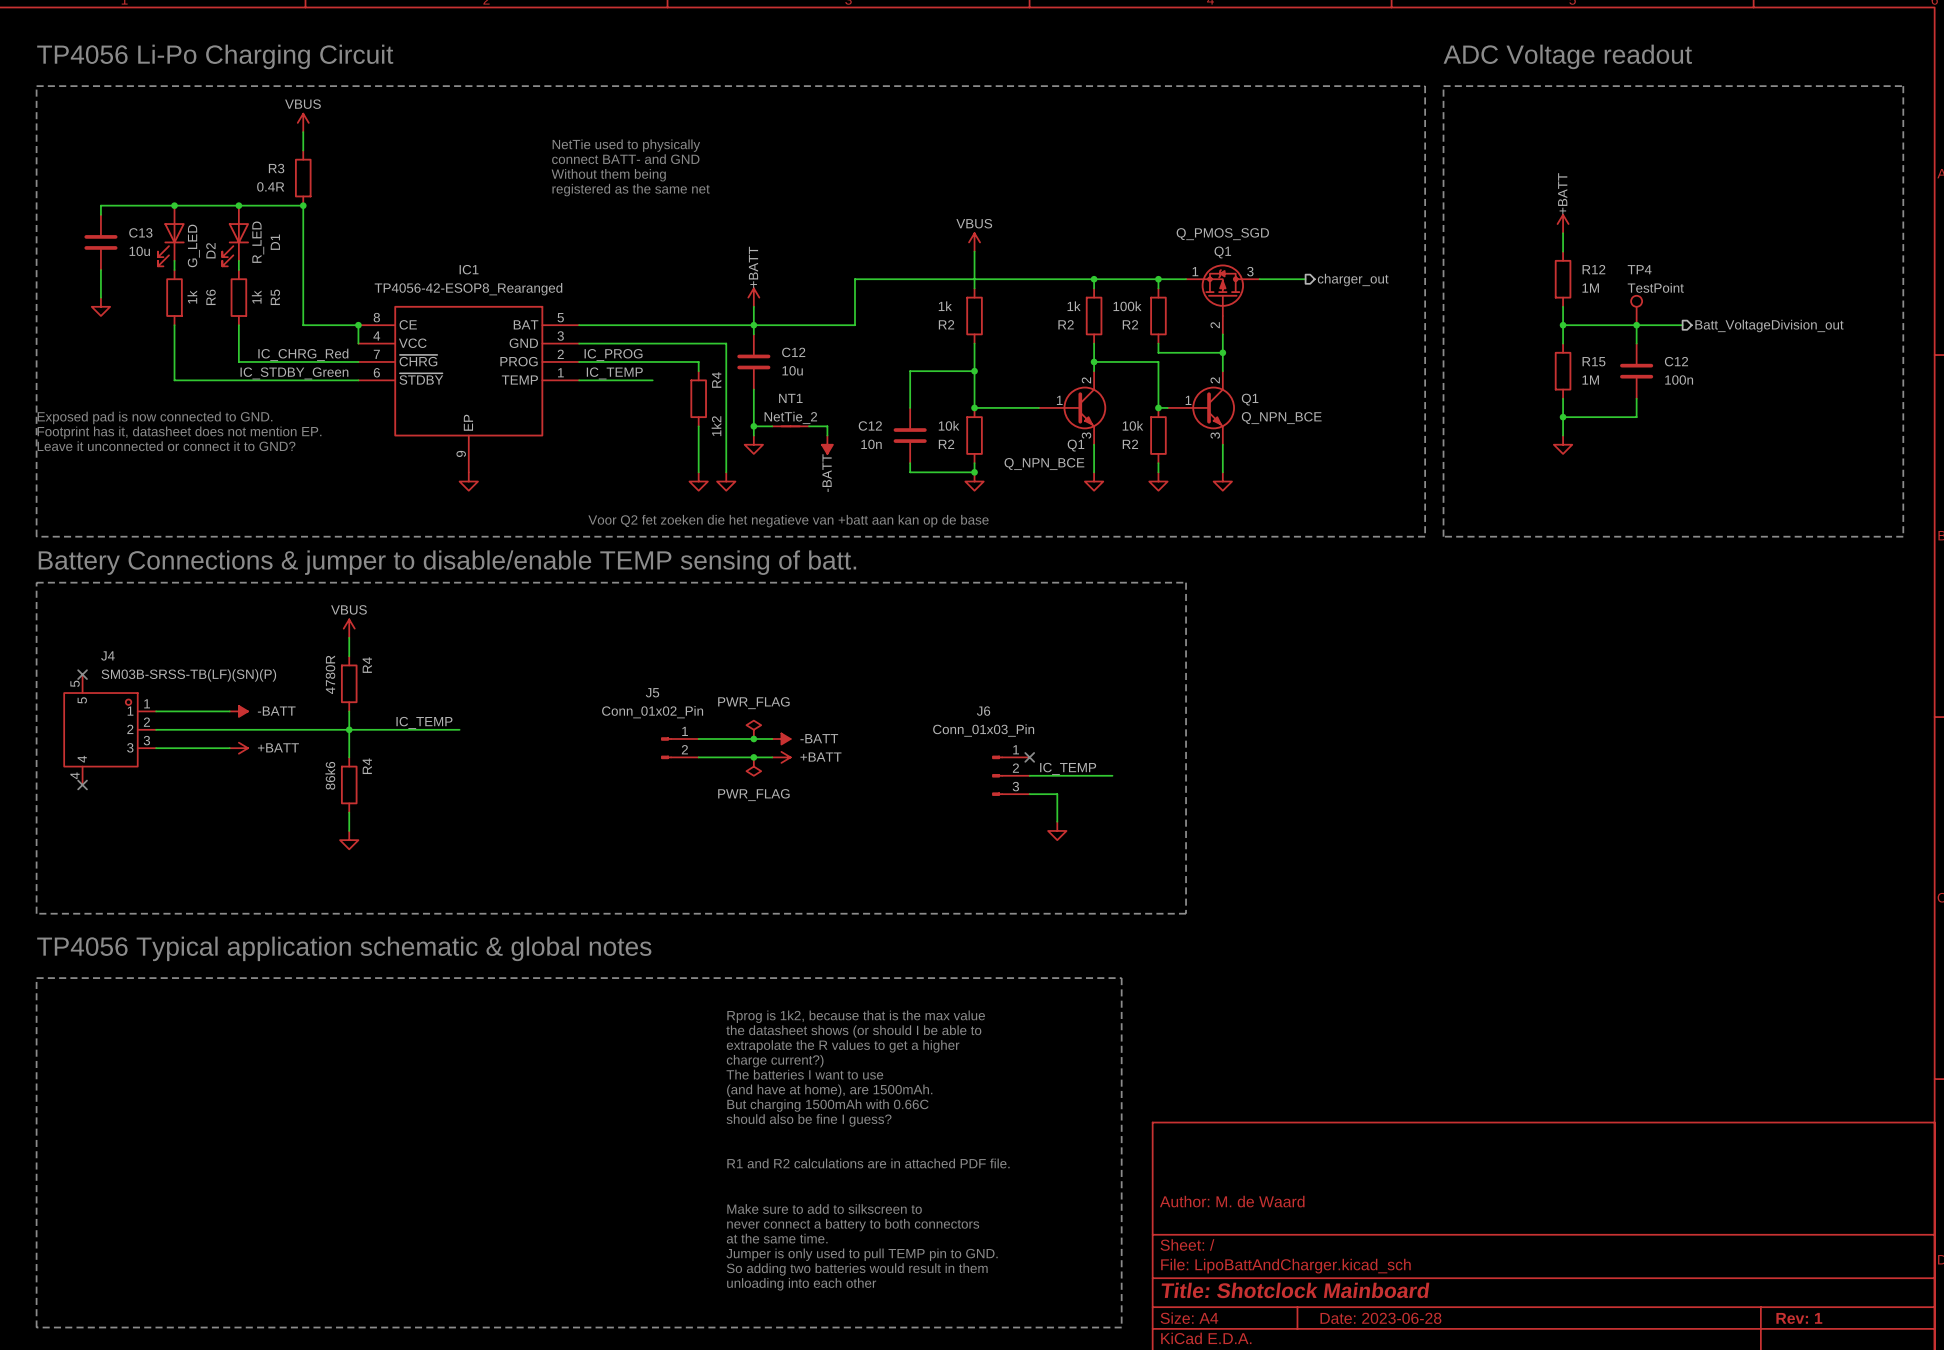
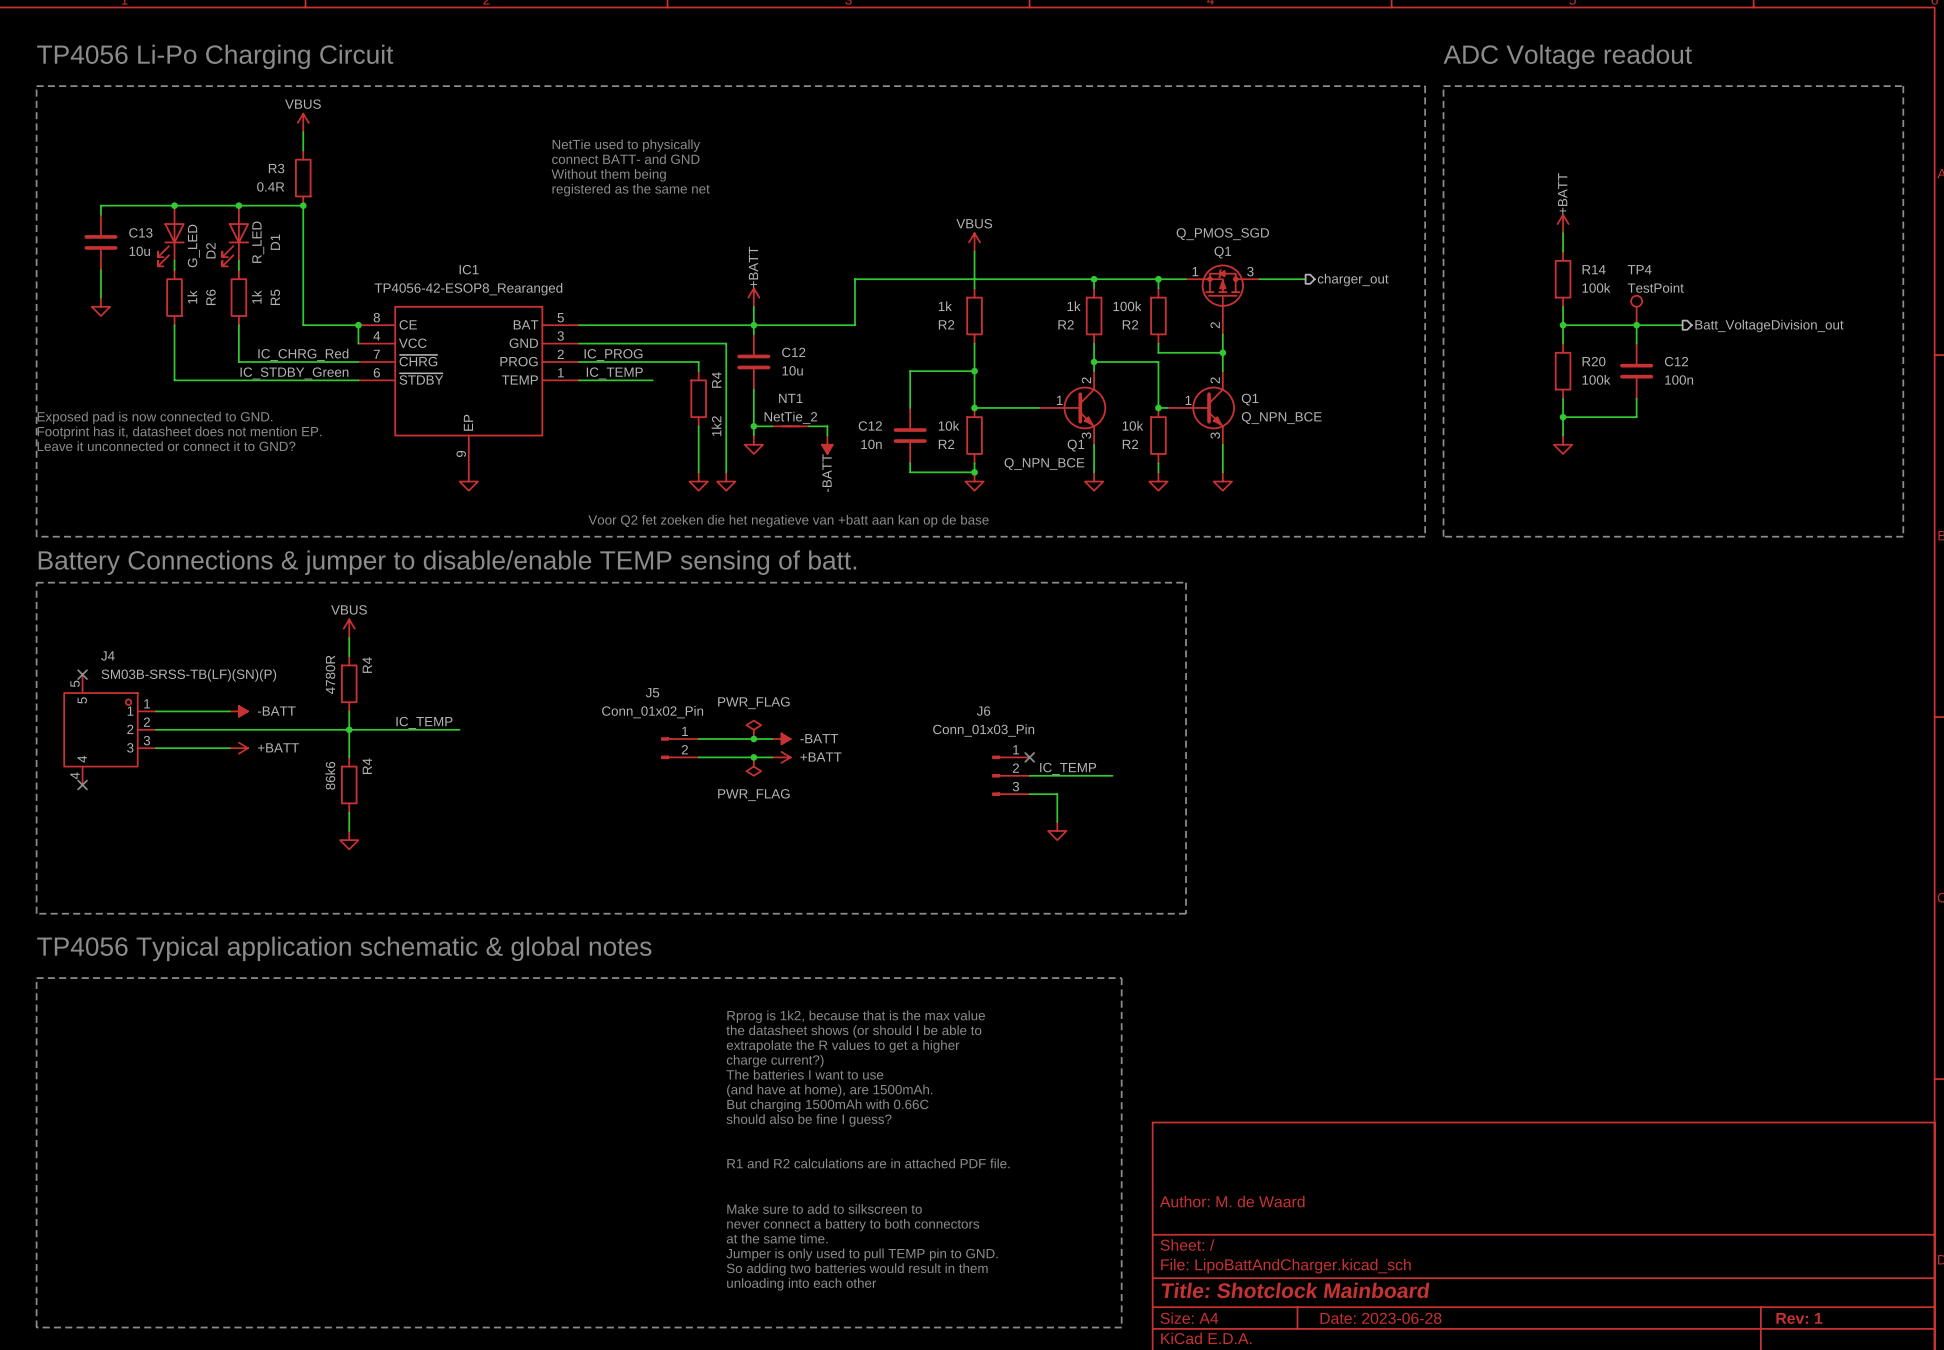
R12 name: R12 (1593, 269) -> R14 (1594, 269)
R12 value: 1M (1590, 288) -> 100k (1596, 287)
R15 name: R15 (1593, 361) -> R20 (1594, 361)
R15 value: 1M (1590, 380) -> 100k (1596, 379)

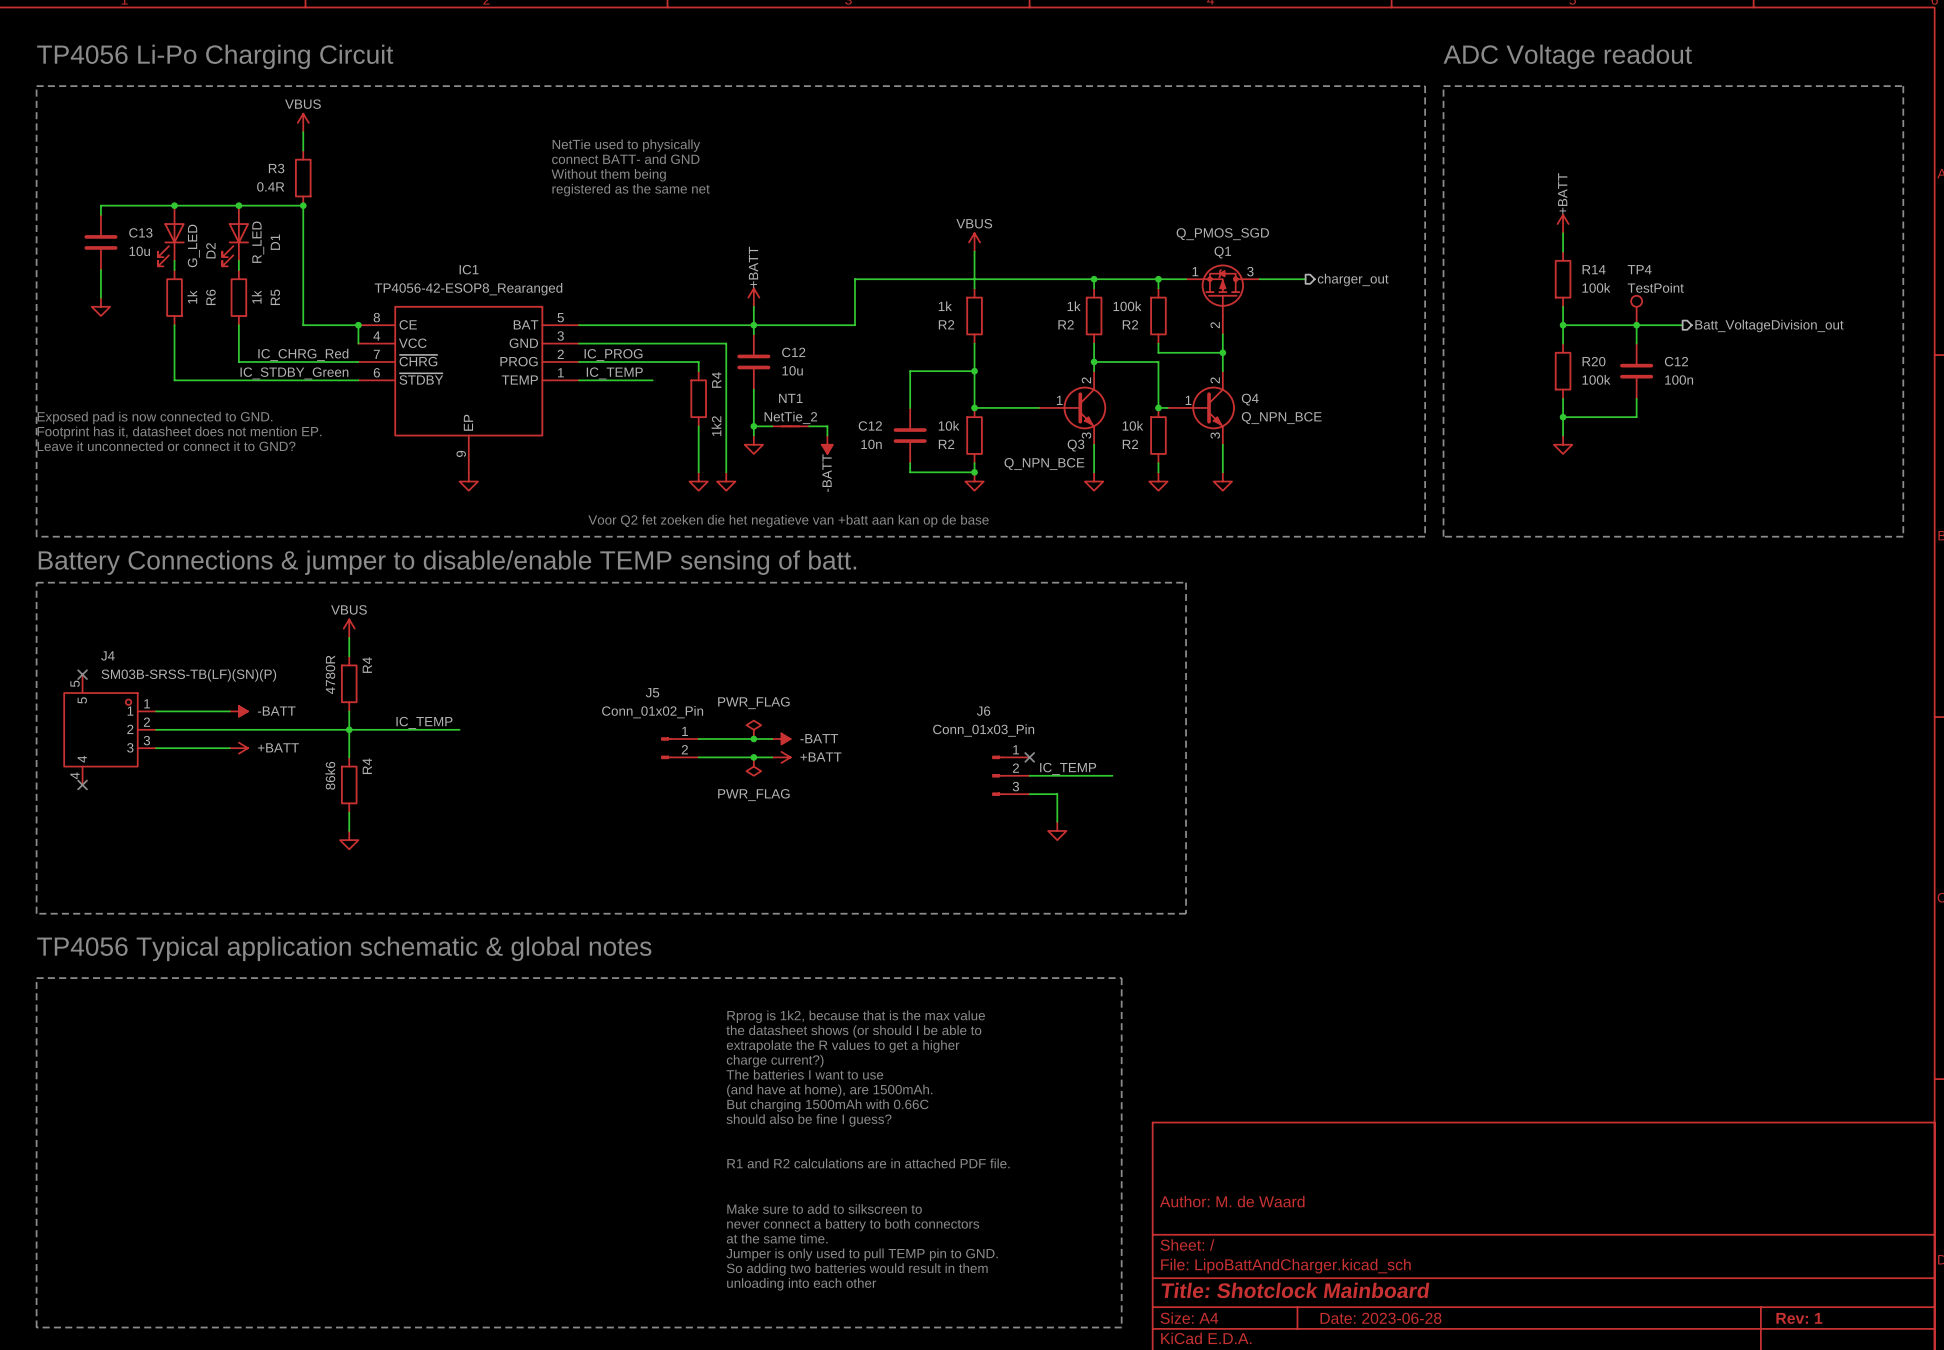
Q1 name: Q1 (1250, 399) -> Q4 (1250, 399)
Q1 name: Q1 (1075, 445) -> Q3 (1075, 445)

